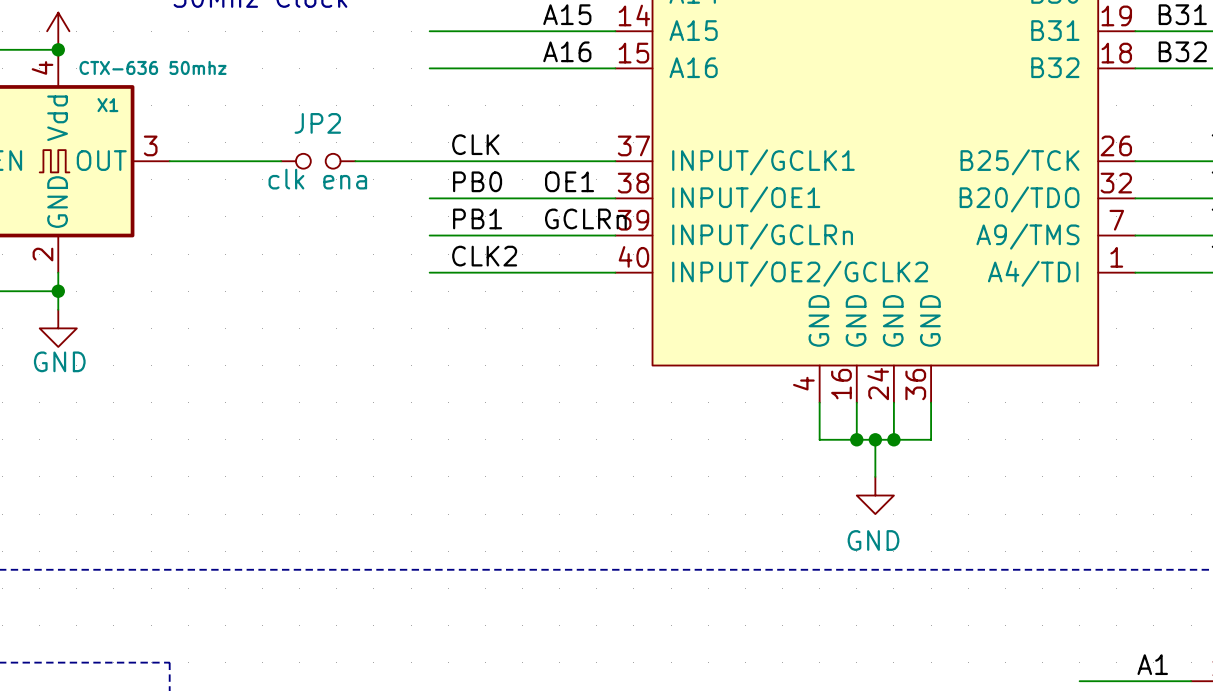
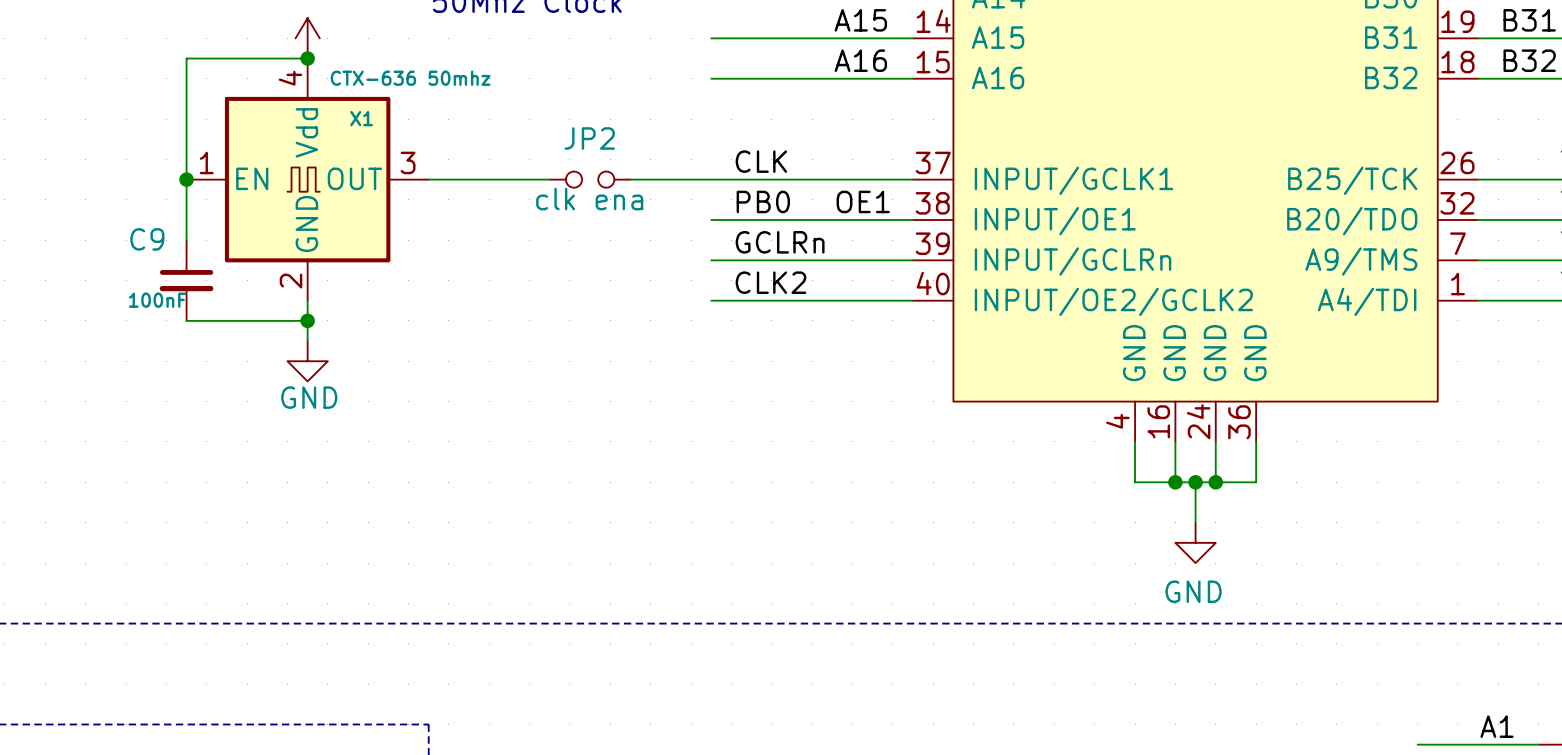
label: PB1 (477, 218) -> GCLRn (780, 242)
label: GCLRn (585, 218) -> none

